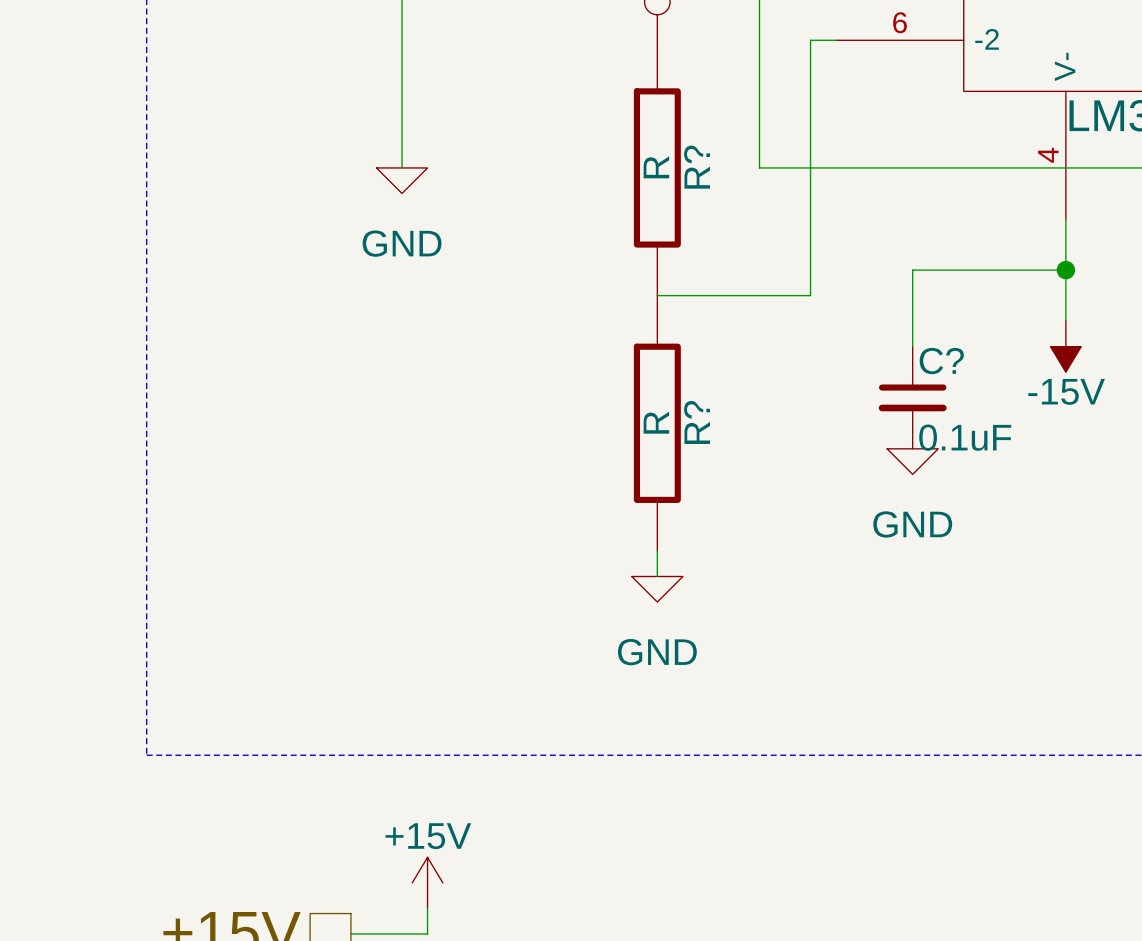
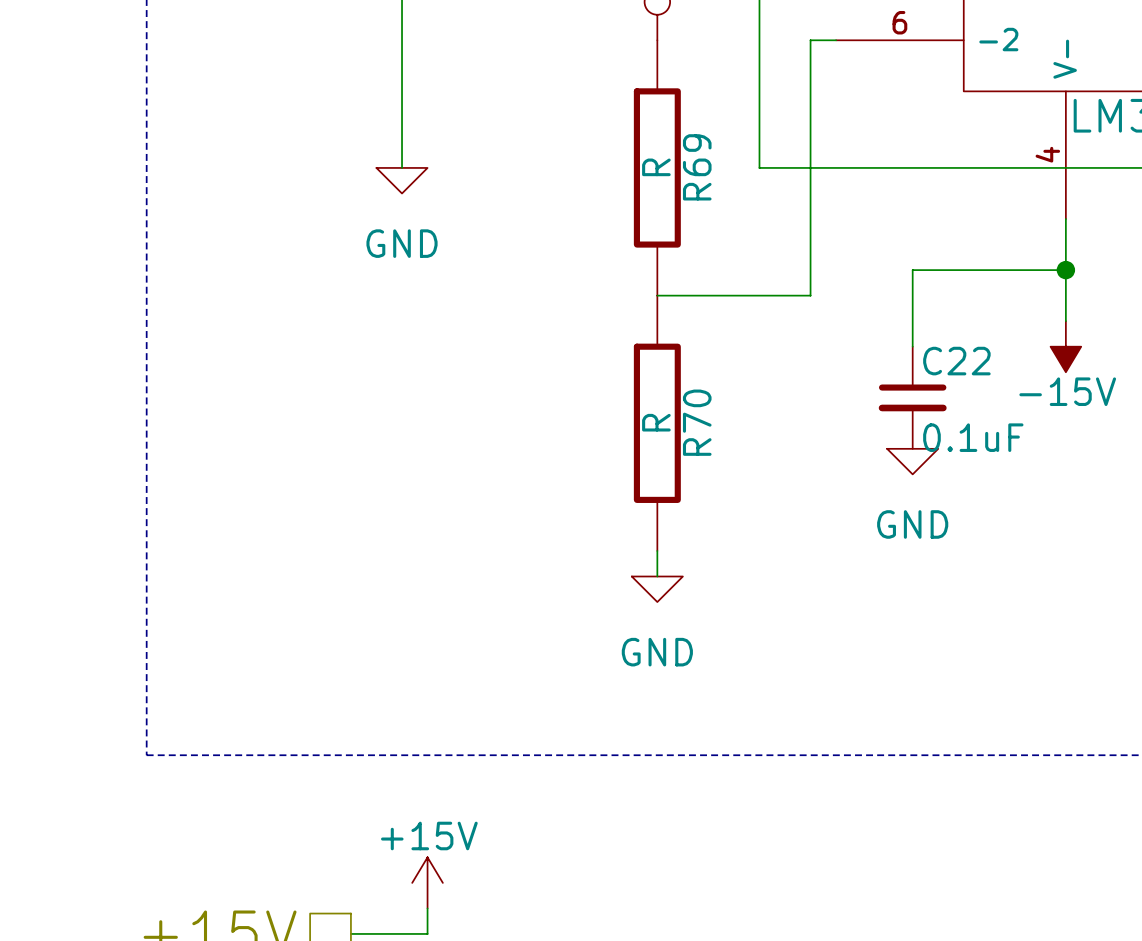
R? name: R? (697, 167) -> R69 (697, 167)
C? name: C? (941, 361) -> C22 (956, 361)
R? name: R? (697, 422) -> R70 (697, 422)

